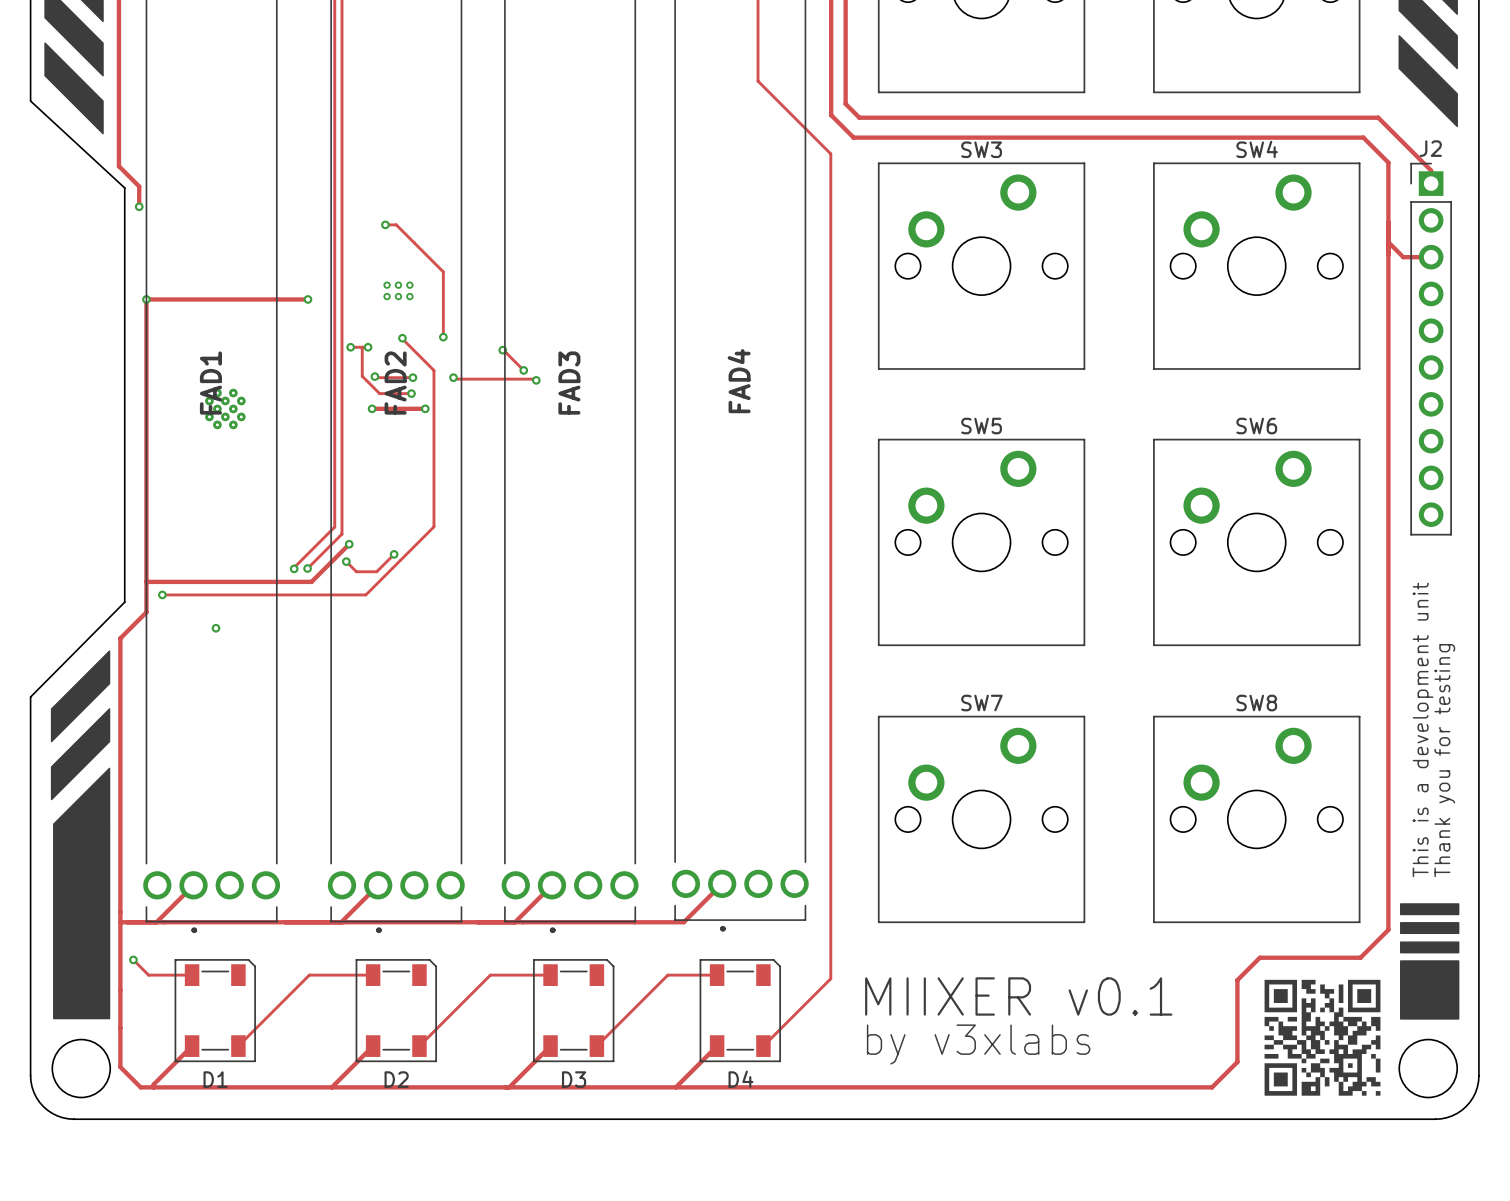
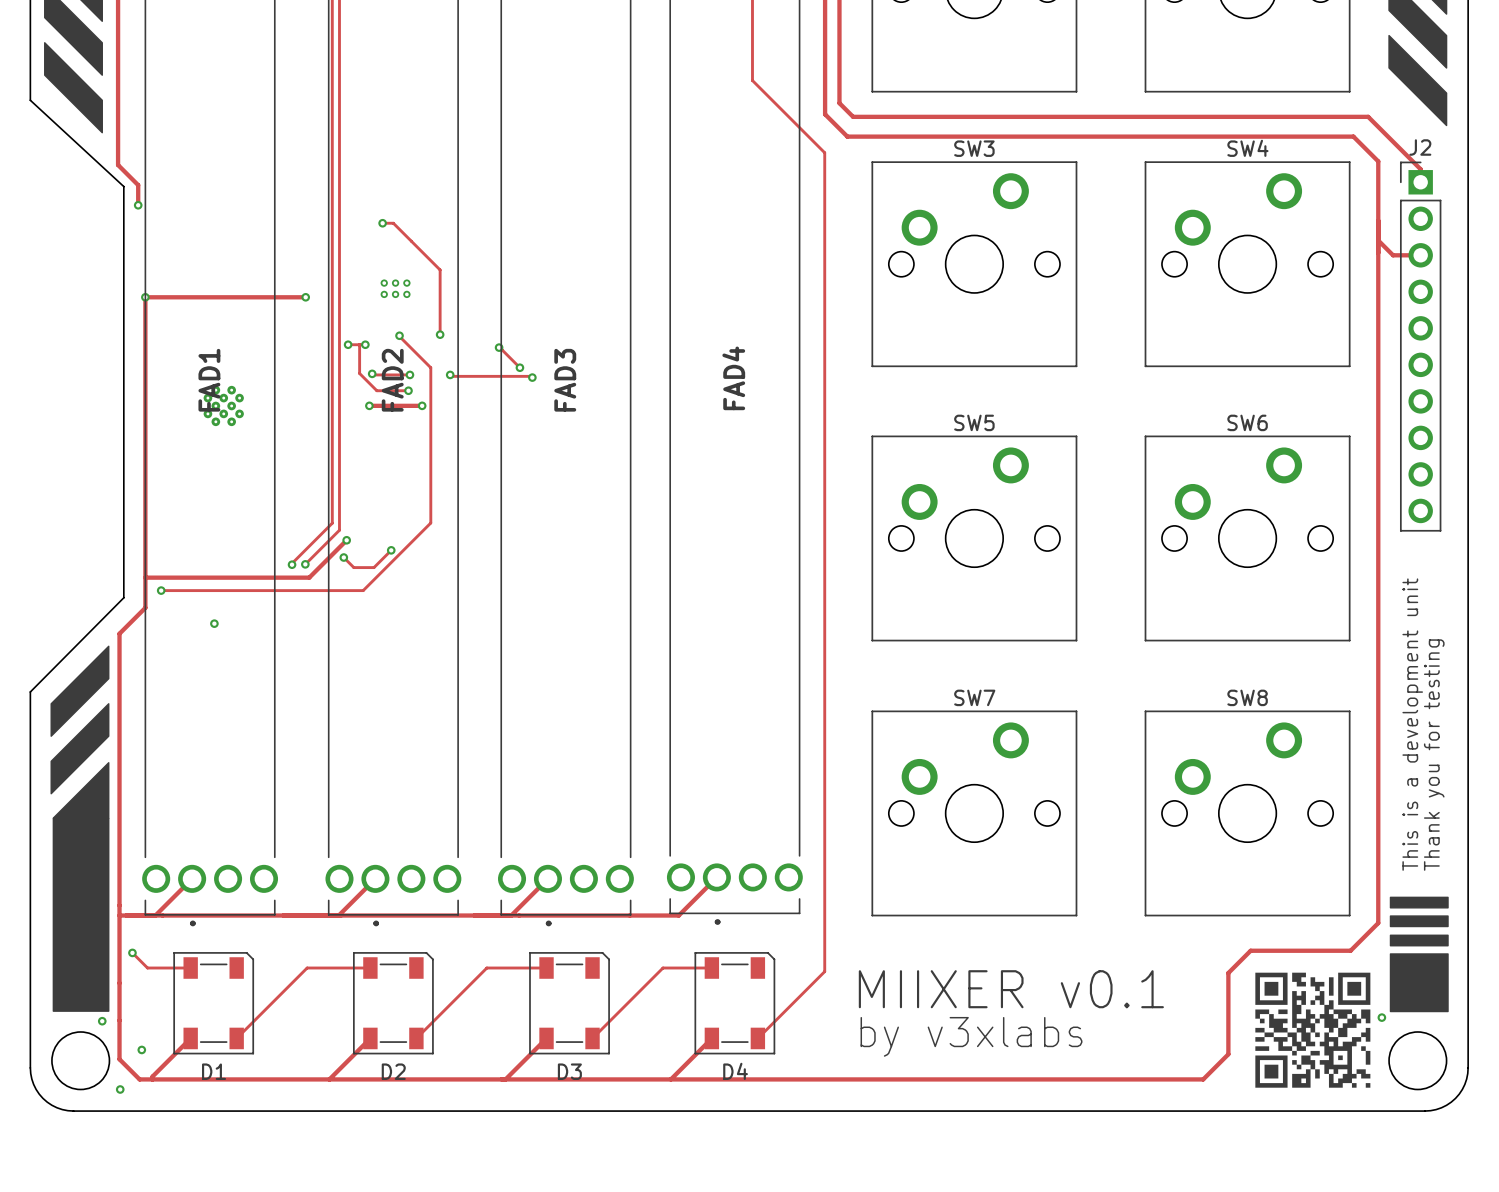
via: none -> (1381, 1017)
via: none -> (102, 1021)
via: none -> (141, 1049)
via: none -> (120, 1089)

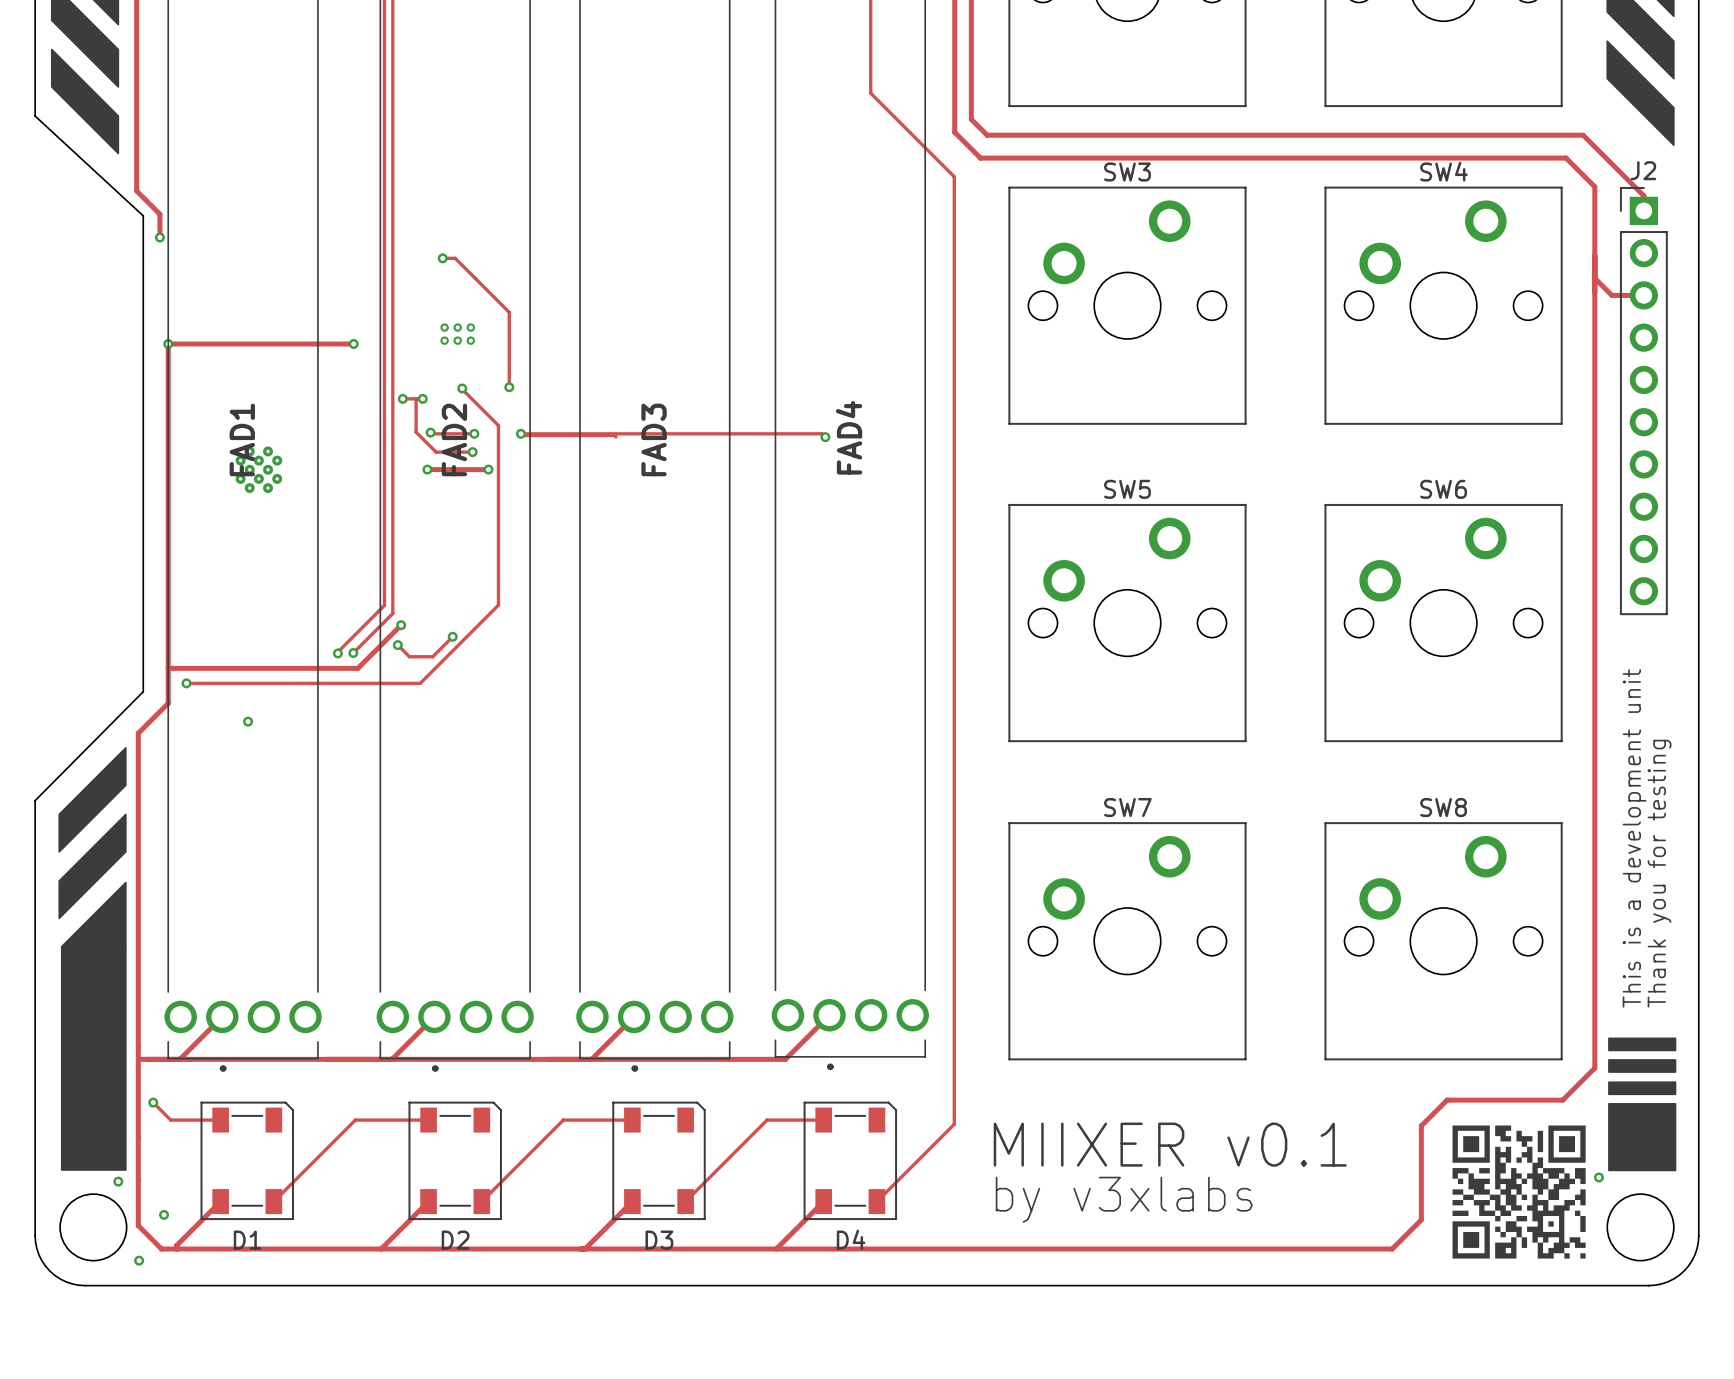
track: (499, 347) (519, 367) -> none
via: (499, 347) -> none
via: (519, 367) -> none
track: none -> (520, 433) (822, 433) (825, 437)
via: (532, 377) -> none
via: none -> (825, 437)

